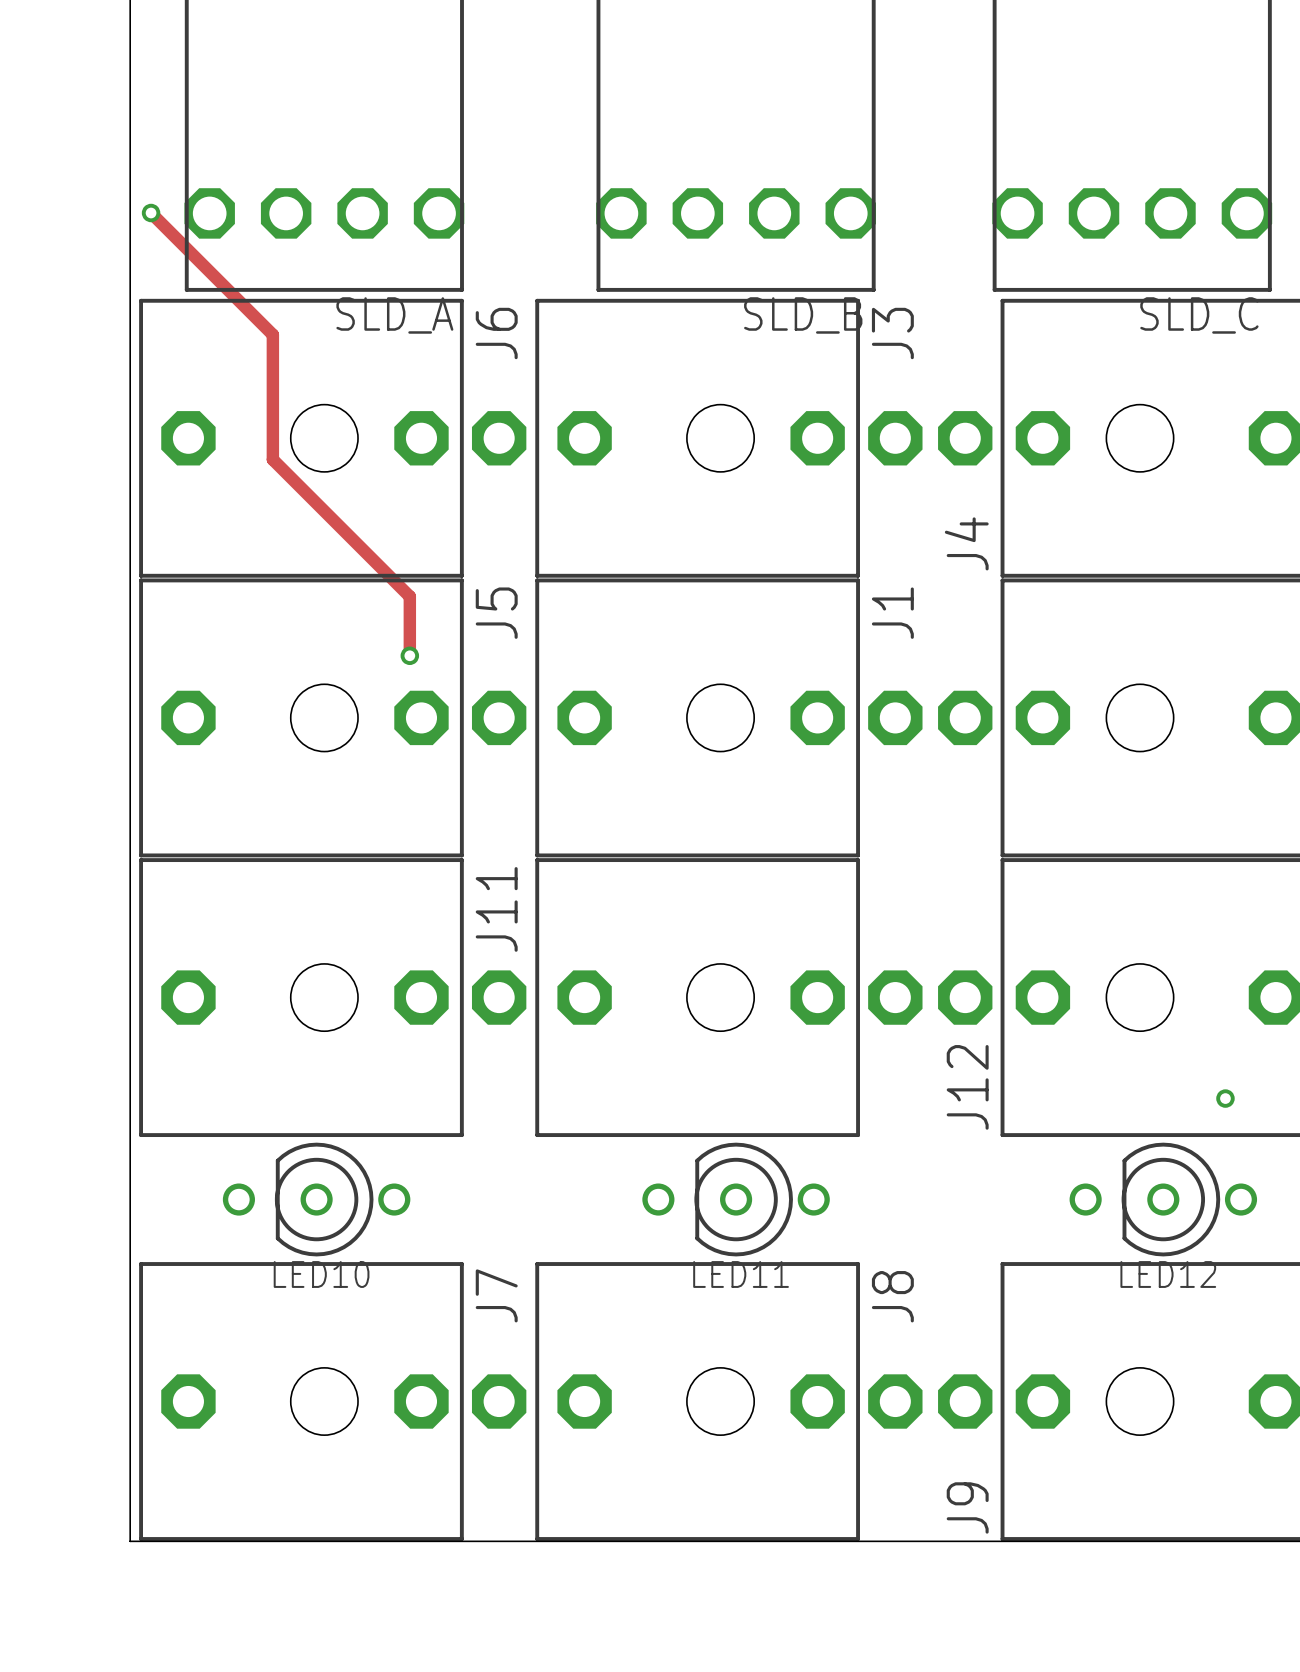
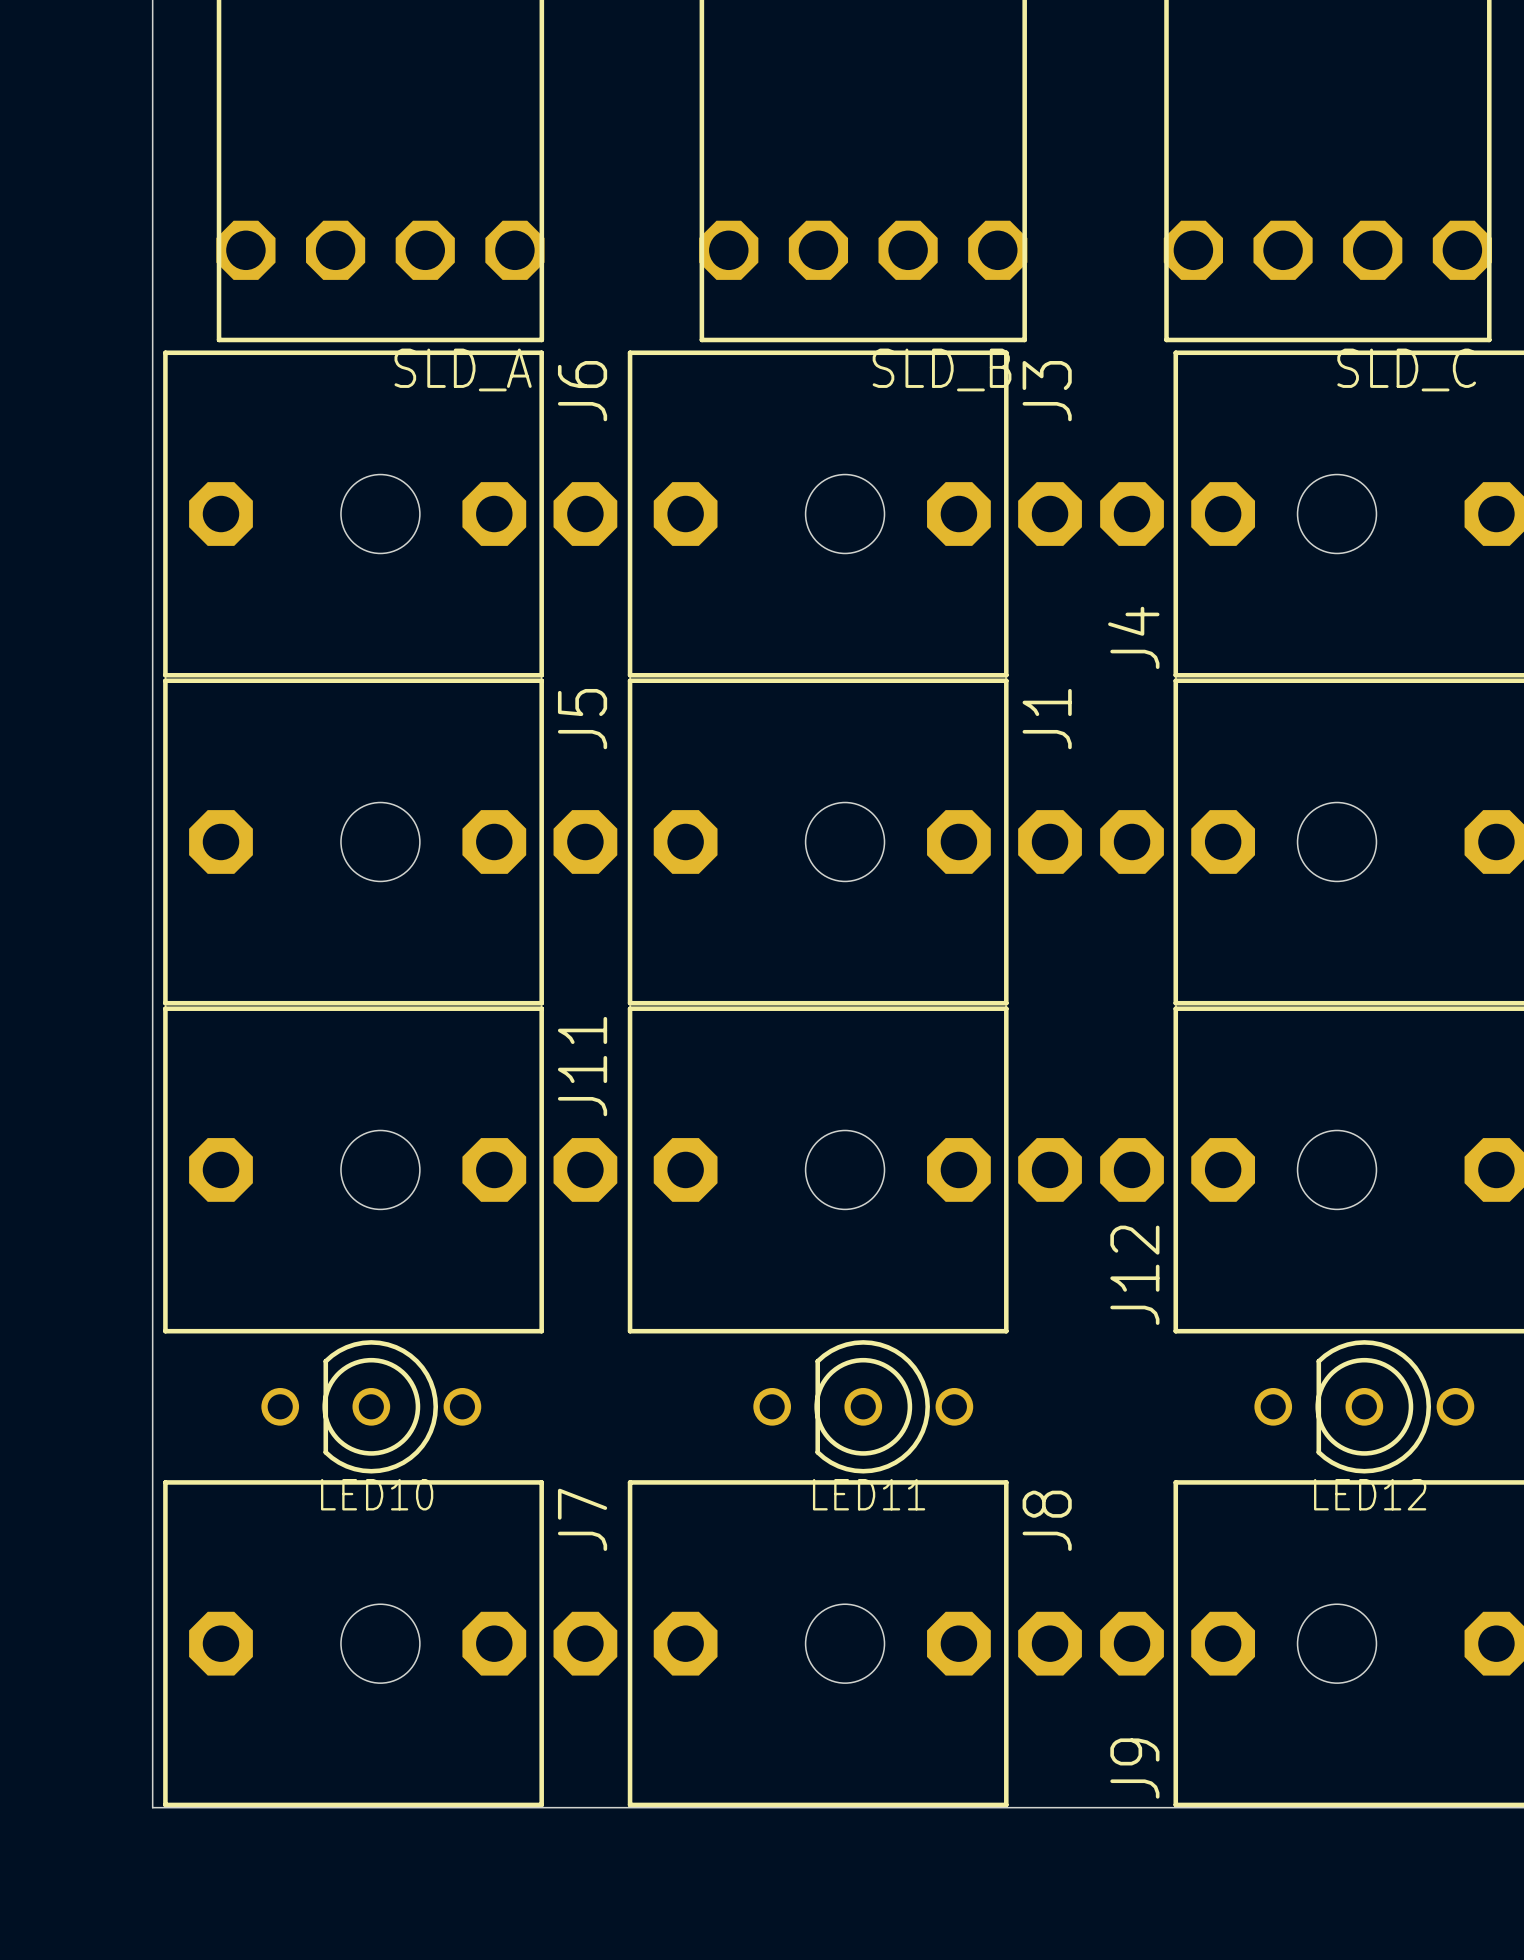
track: (151, 213) (272, 334) (272, 459) (409, 596) (409, 655) -> none
via: (151, 213) -> none
via: (409, 655) -> none
via: (1225, 1098) -> none

